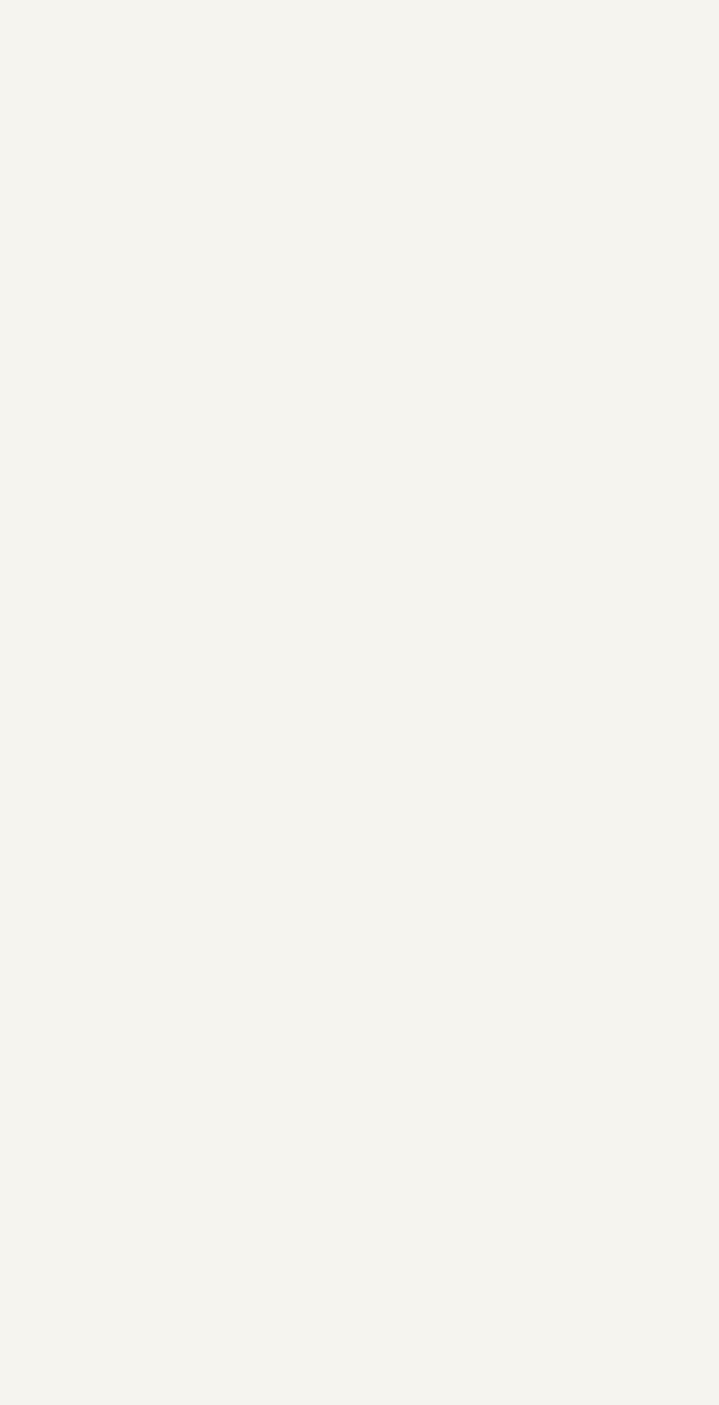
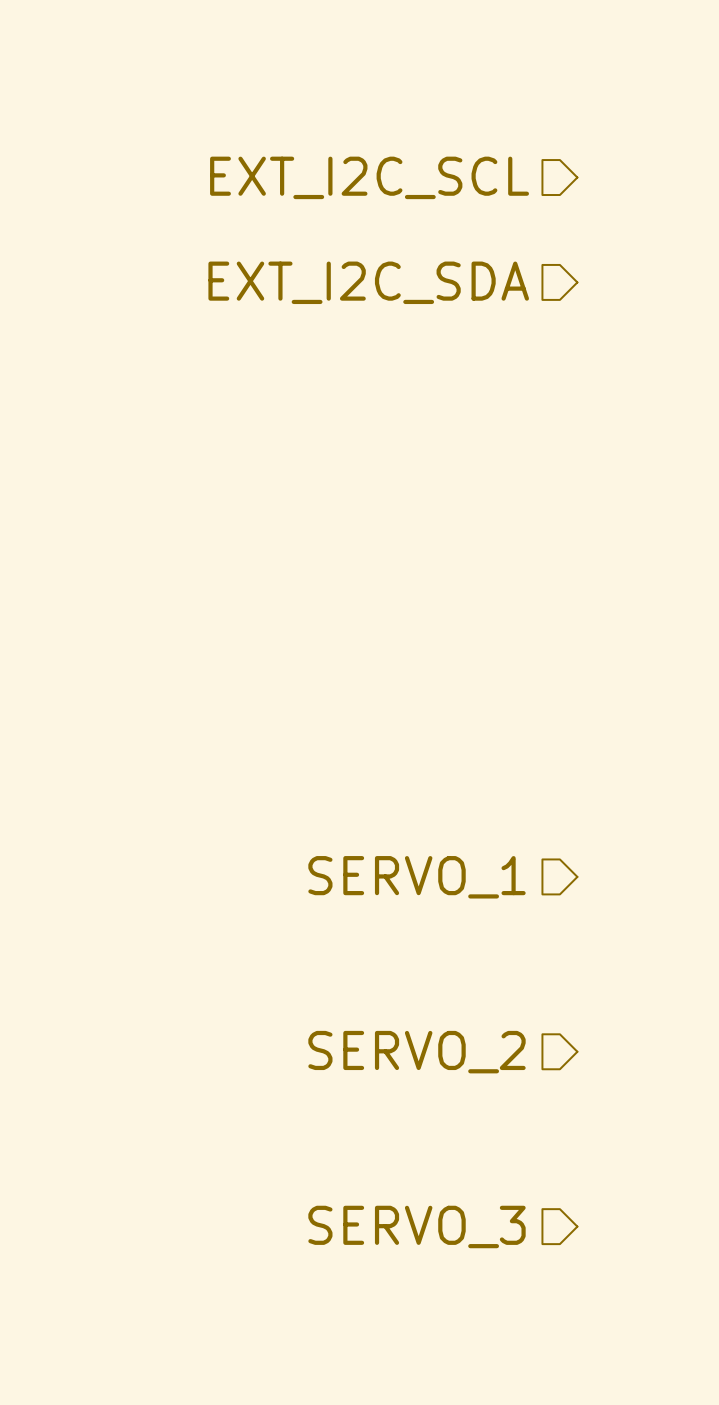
hierarchical label: none -> EXT_I2C_SCL (369, 177)
hierarchical label: none -> EXT_I2C_SDA (368, 282)
hierarchical label: none -> SERVO_1 (416, 877)
hierarchical label: none -> SERVO_2 (416, 1052)
hierarchical label: none -> SERVO_3 (416, 1226)

